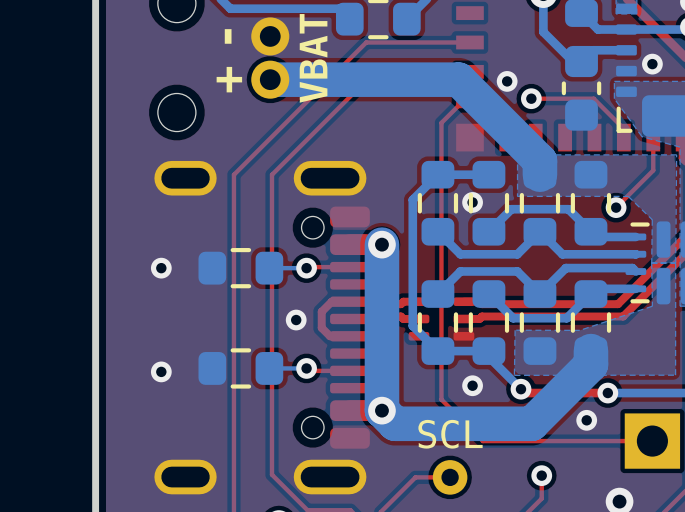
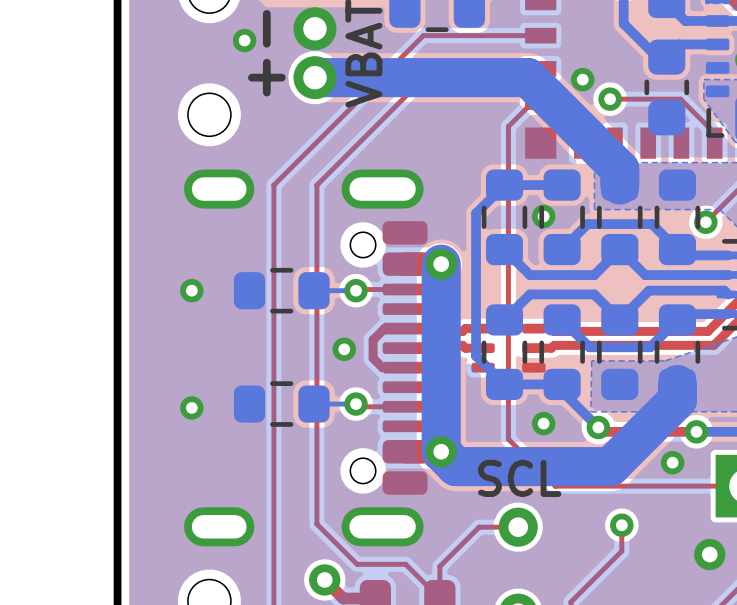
via: none -> (244, 40)

